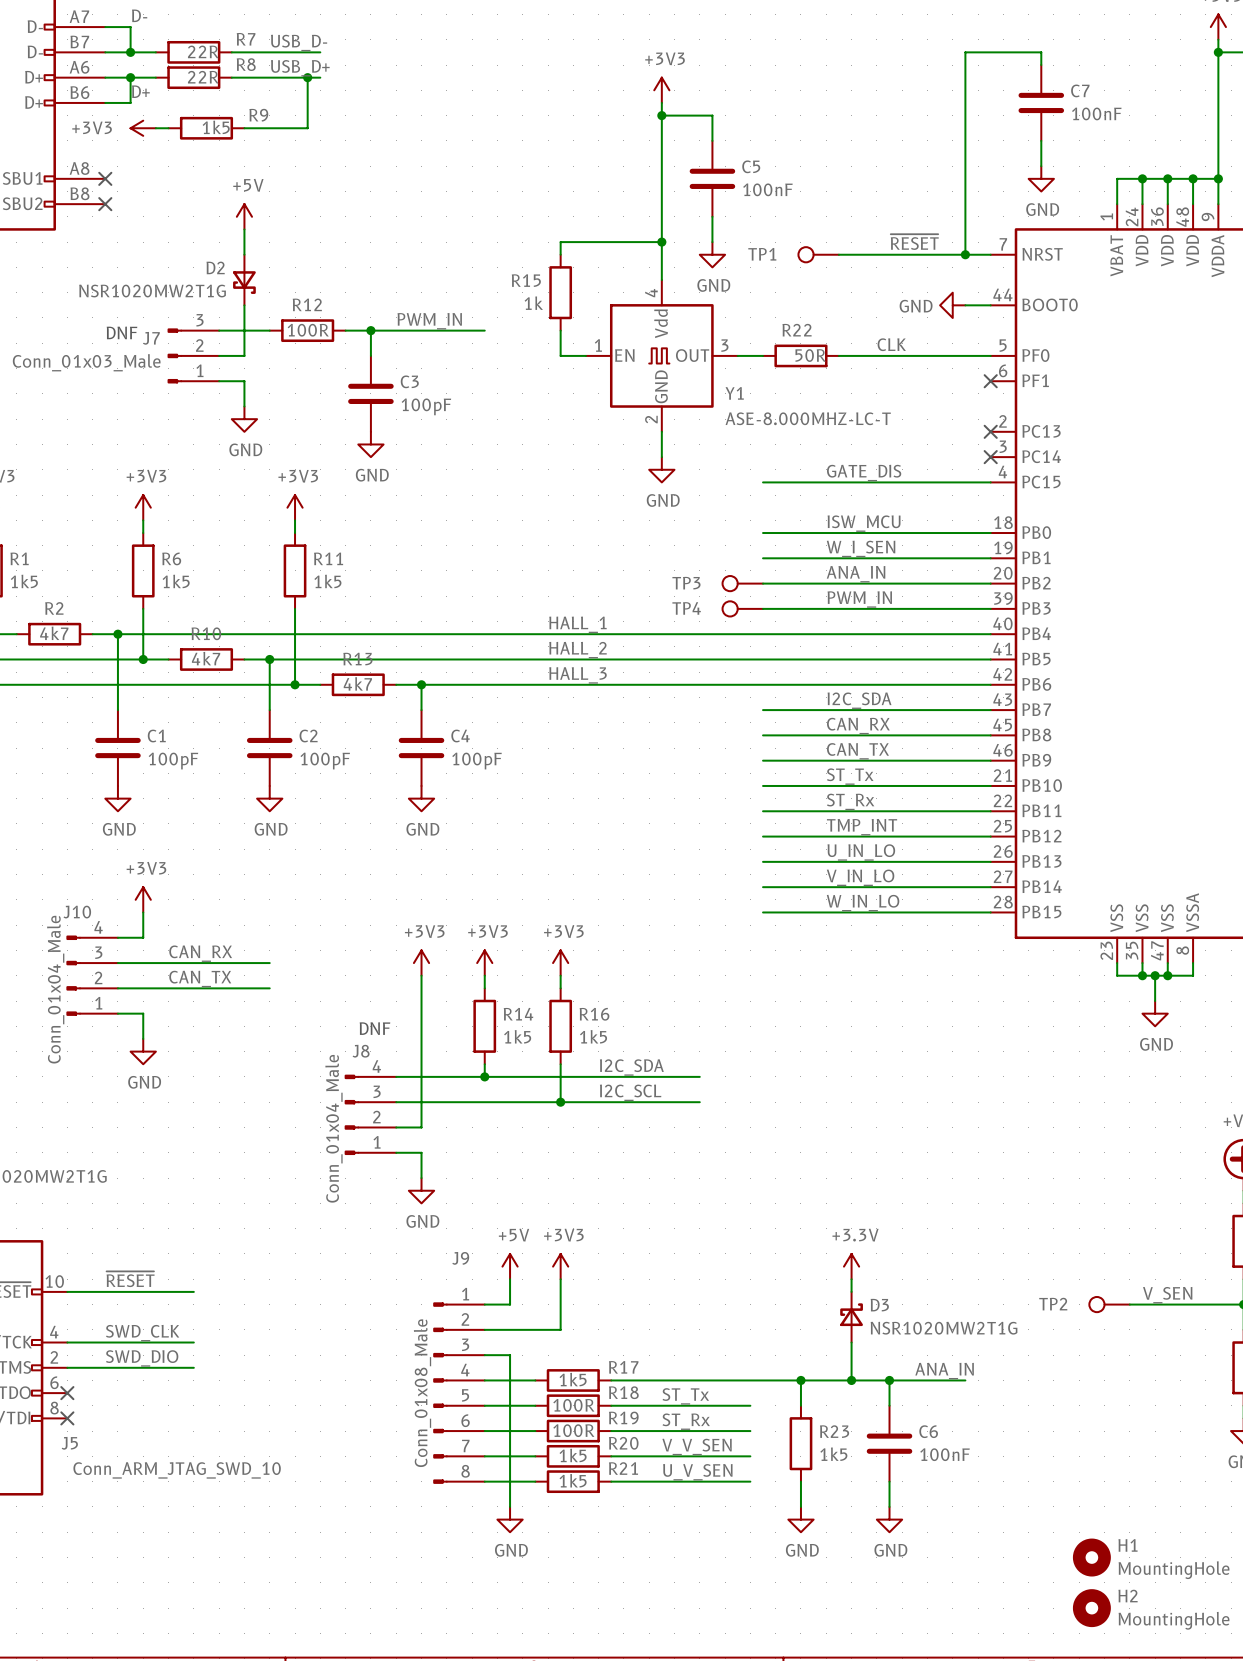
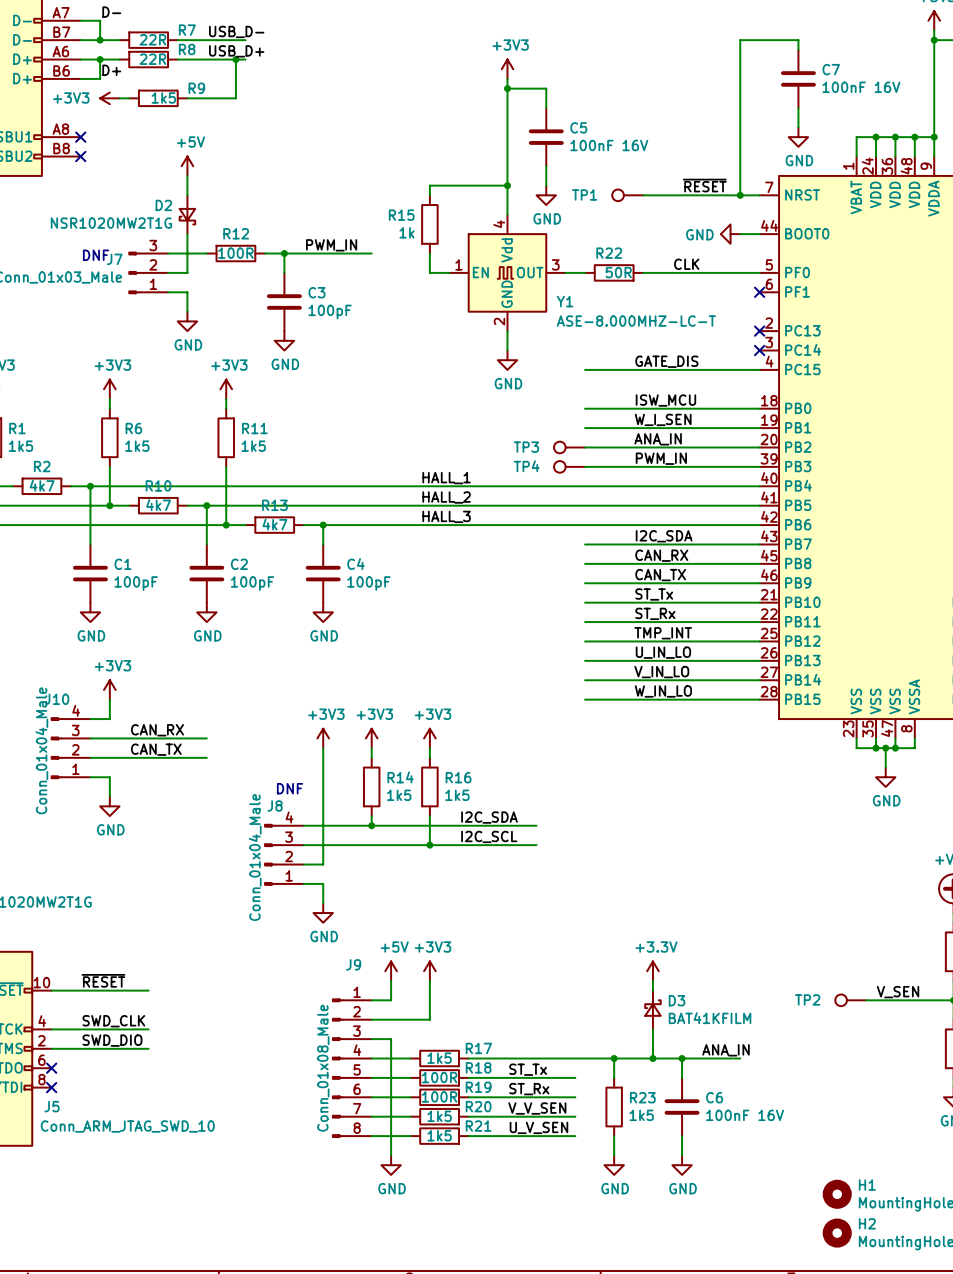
C7 value: 100nF (1096, 113) -> 100nF 16V (861, 87)
C5 value: 100nF (767, 189) -> 100nF 16V (609, 145)
D3 value: NSR1020MW2T1G (944, 1328) -> BAT41KFILM (710, 1018)
C6 value: 100nF (944, 1454) -> 100nF 16V (745, 1115)

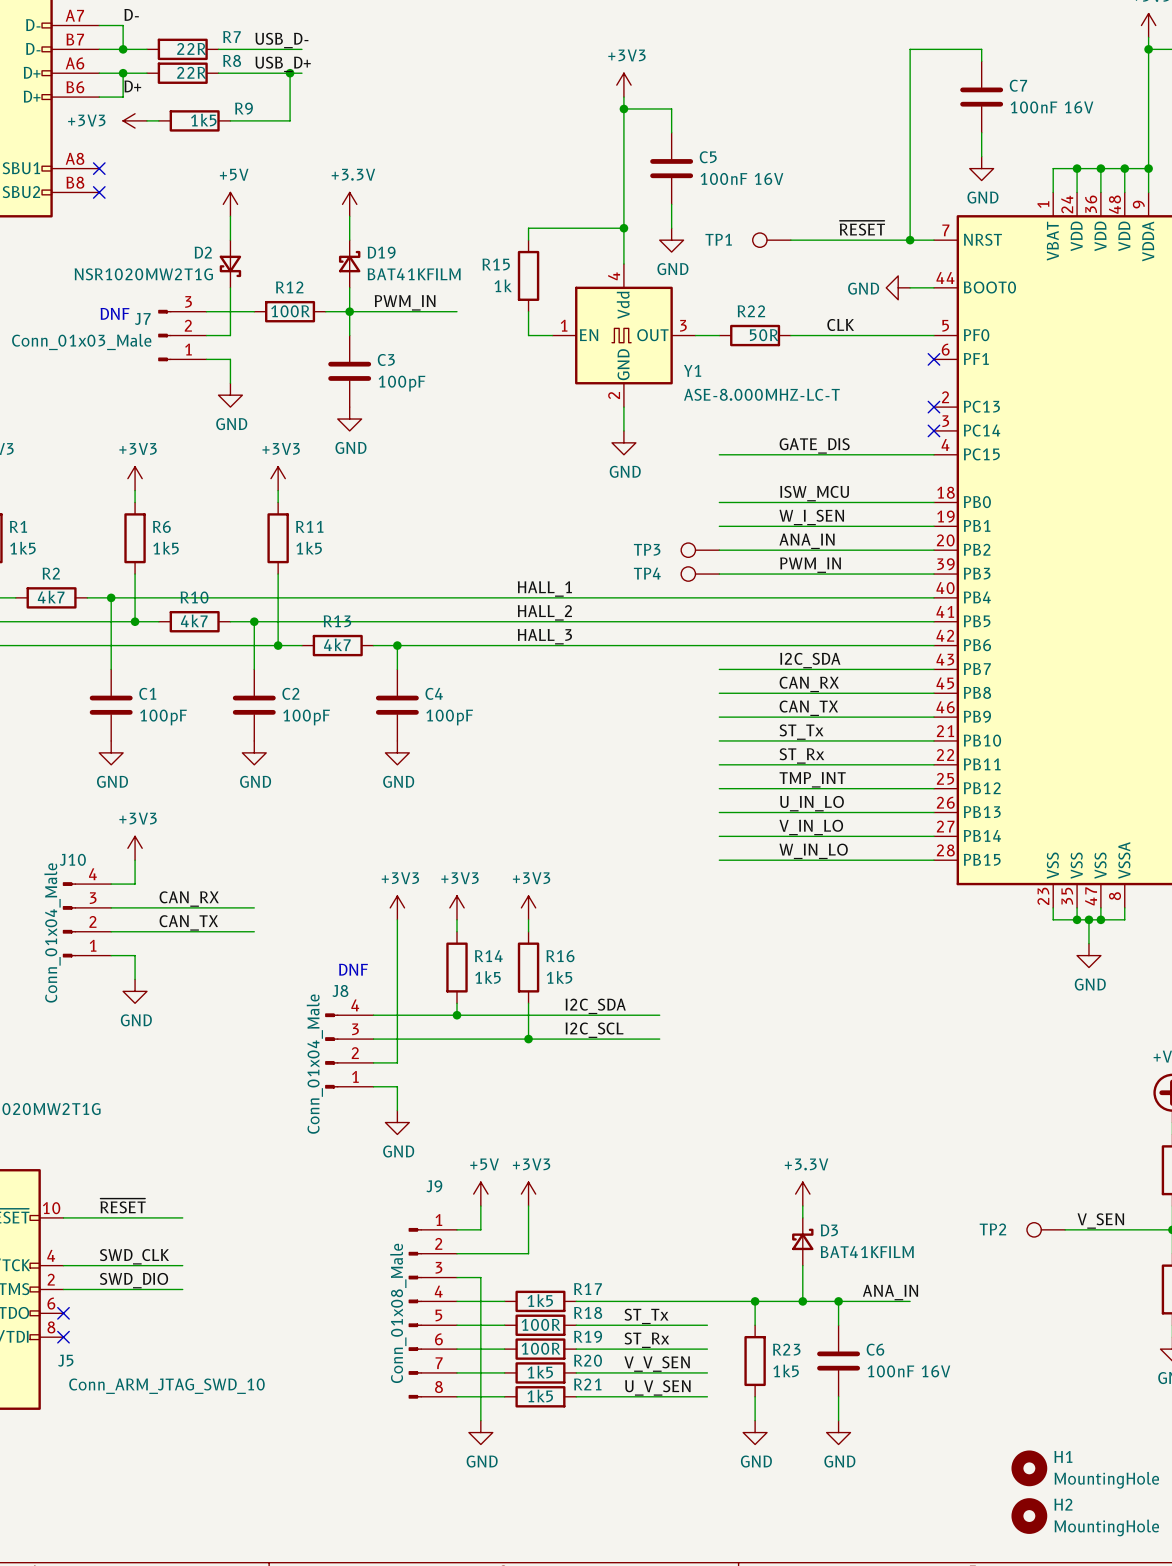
power symbol: none -> +3.3V (349, 204)
wire: none -> (349, 216) (349, 240)
D19: none -> BAT41KFILM (349, 264)
wire: none -> (349, 287) (349, 311)

